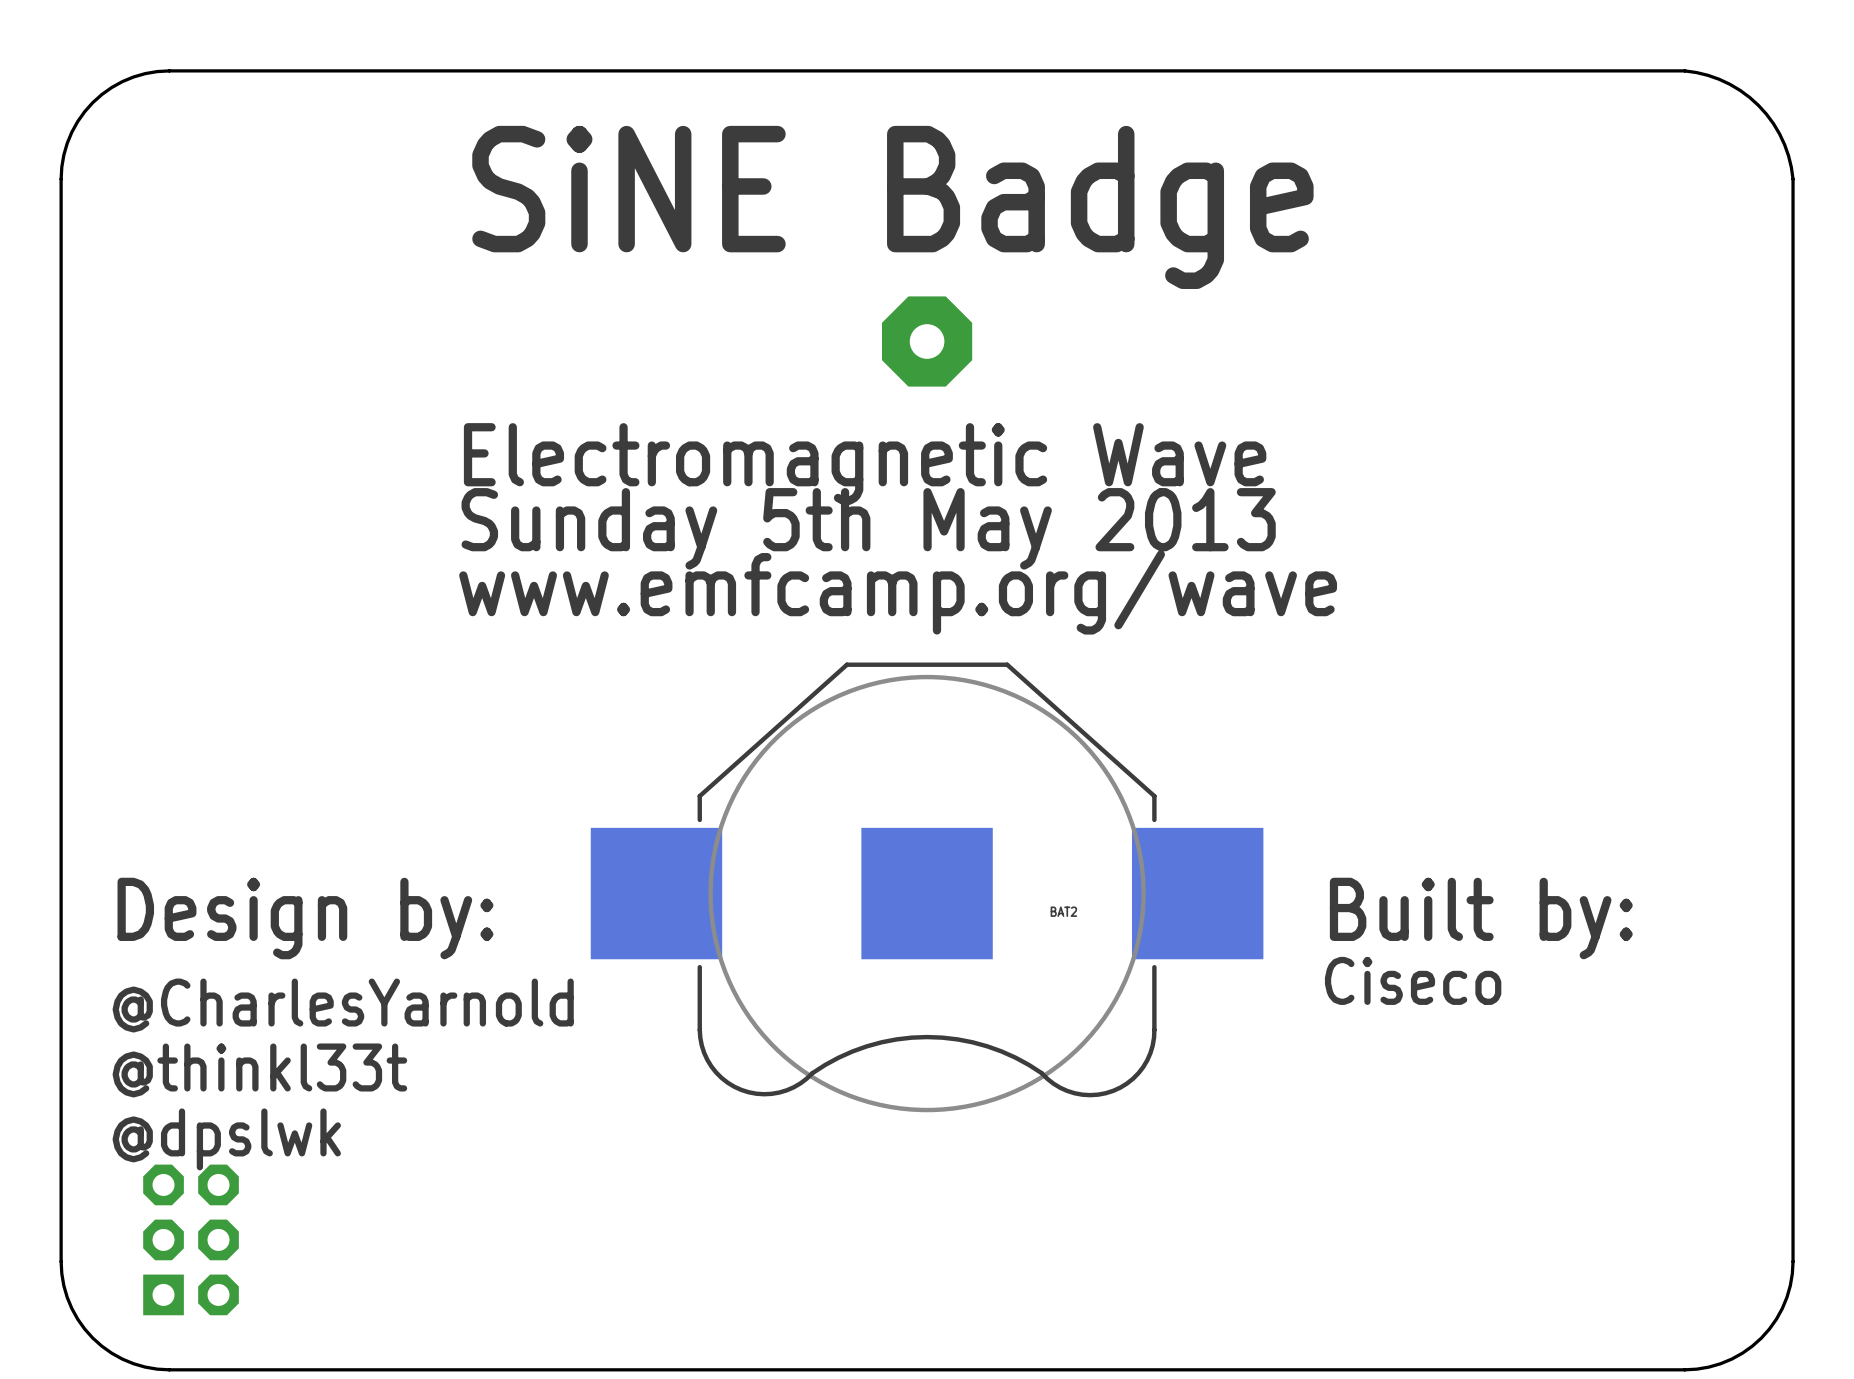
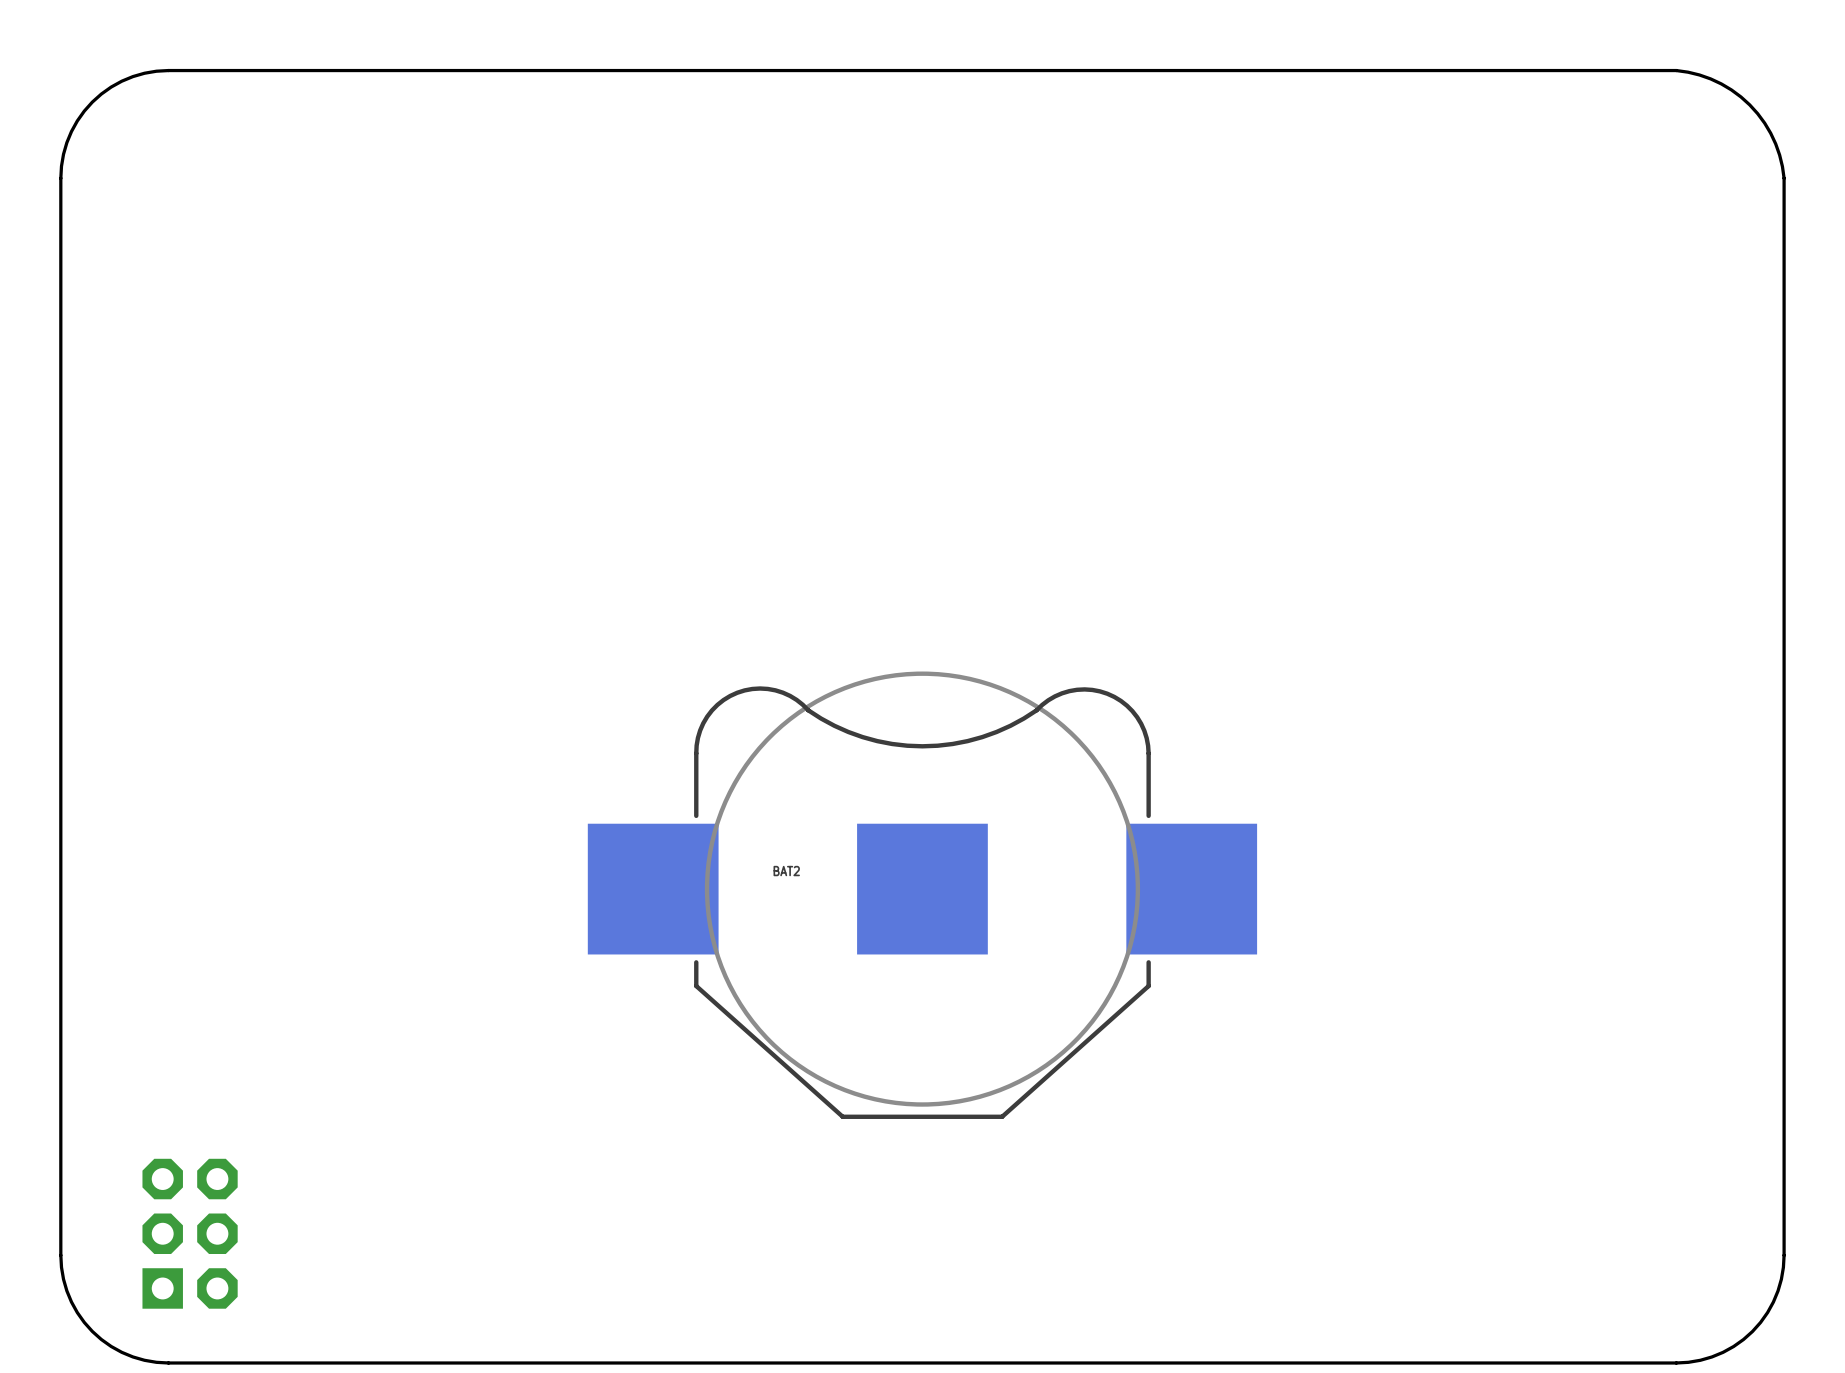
text: SiNE Badge (892, 207) -> none
part: (927, 341) -> none
text: Electromagnetic Wave (865, 463) -> none
text: Sunday 5th May 2013 (868, 528) -> none
text: www.emfcamp.org/wave (898, 592) -> none
BAT2 rotation: 0° (927, 887) -> 180° (922, 895)
text: Design by: (305, 918) -> none
text: Built by: (1481, 918) -> none
text: Ciseco (1413, 980) -> none
text: @CharlesYarnold (343, 1005) -> none
text: @thinkl33t (259, 1070) -> none
text: @dpslwk (226, 1139) -> none

